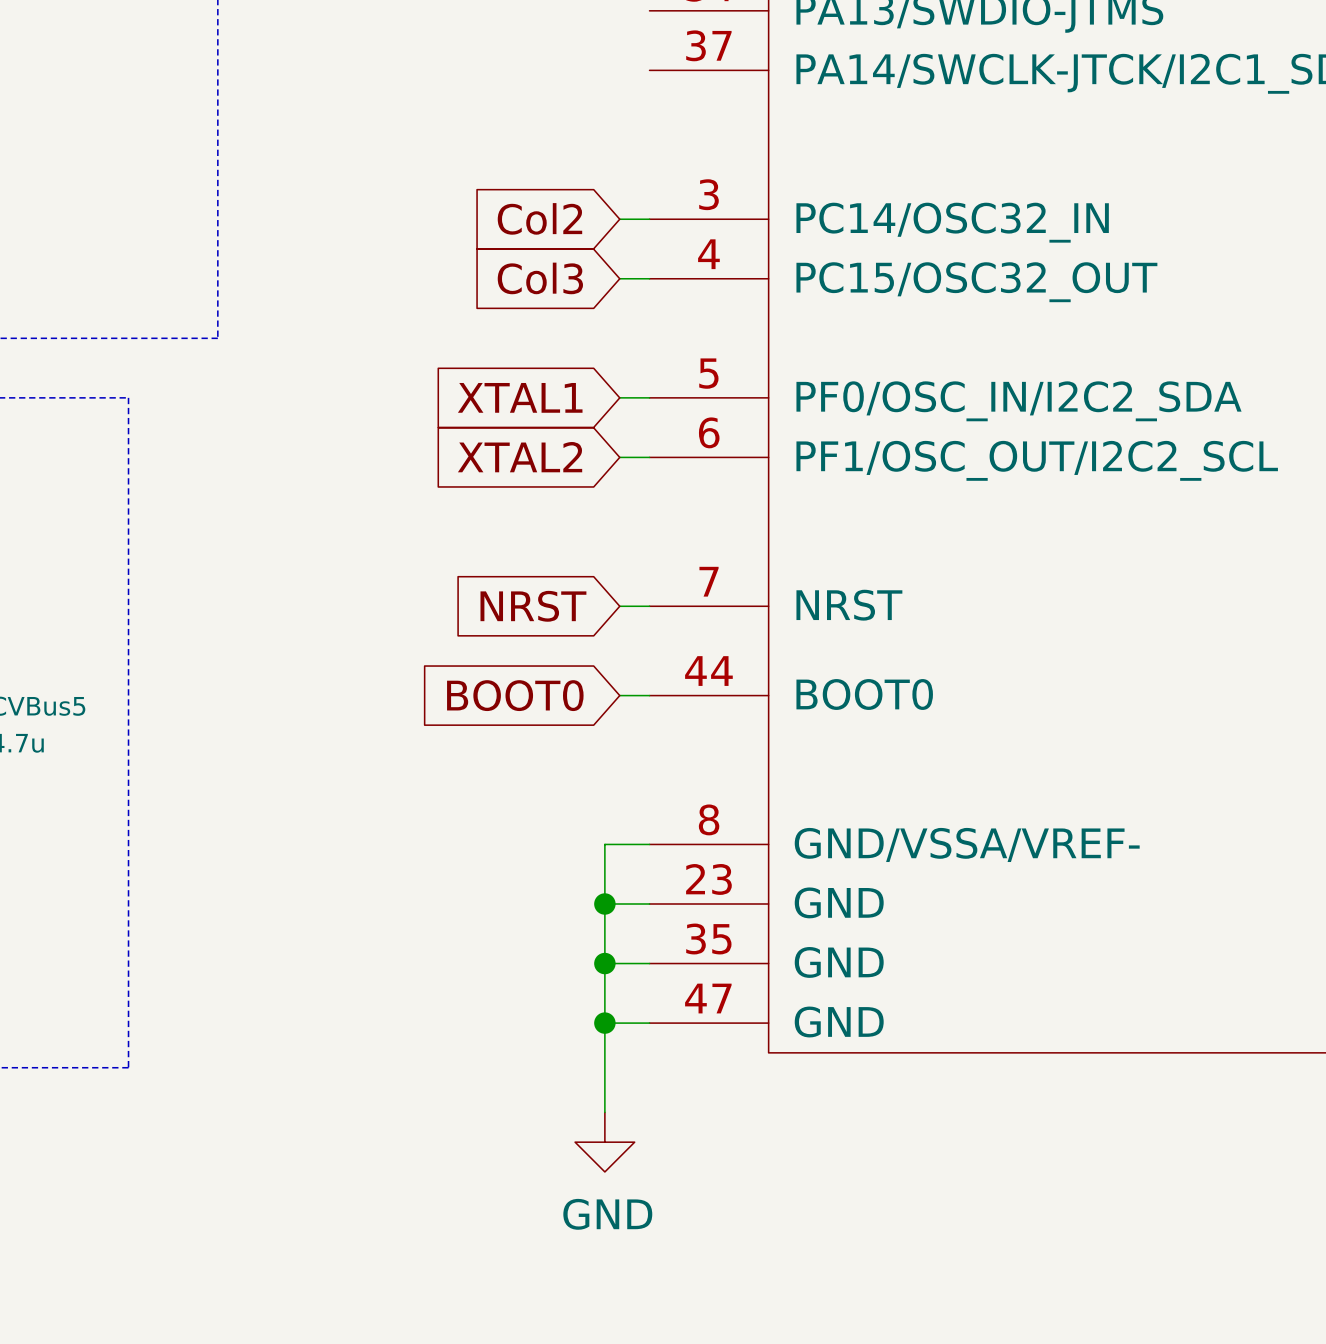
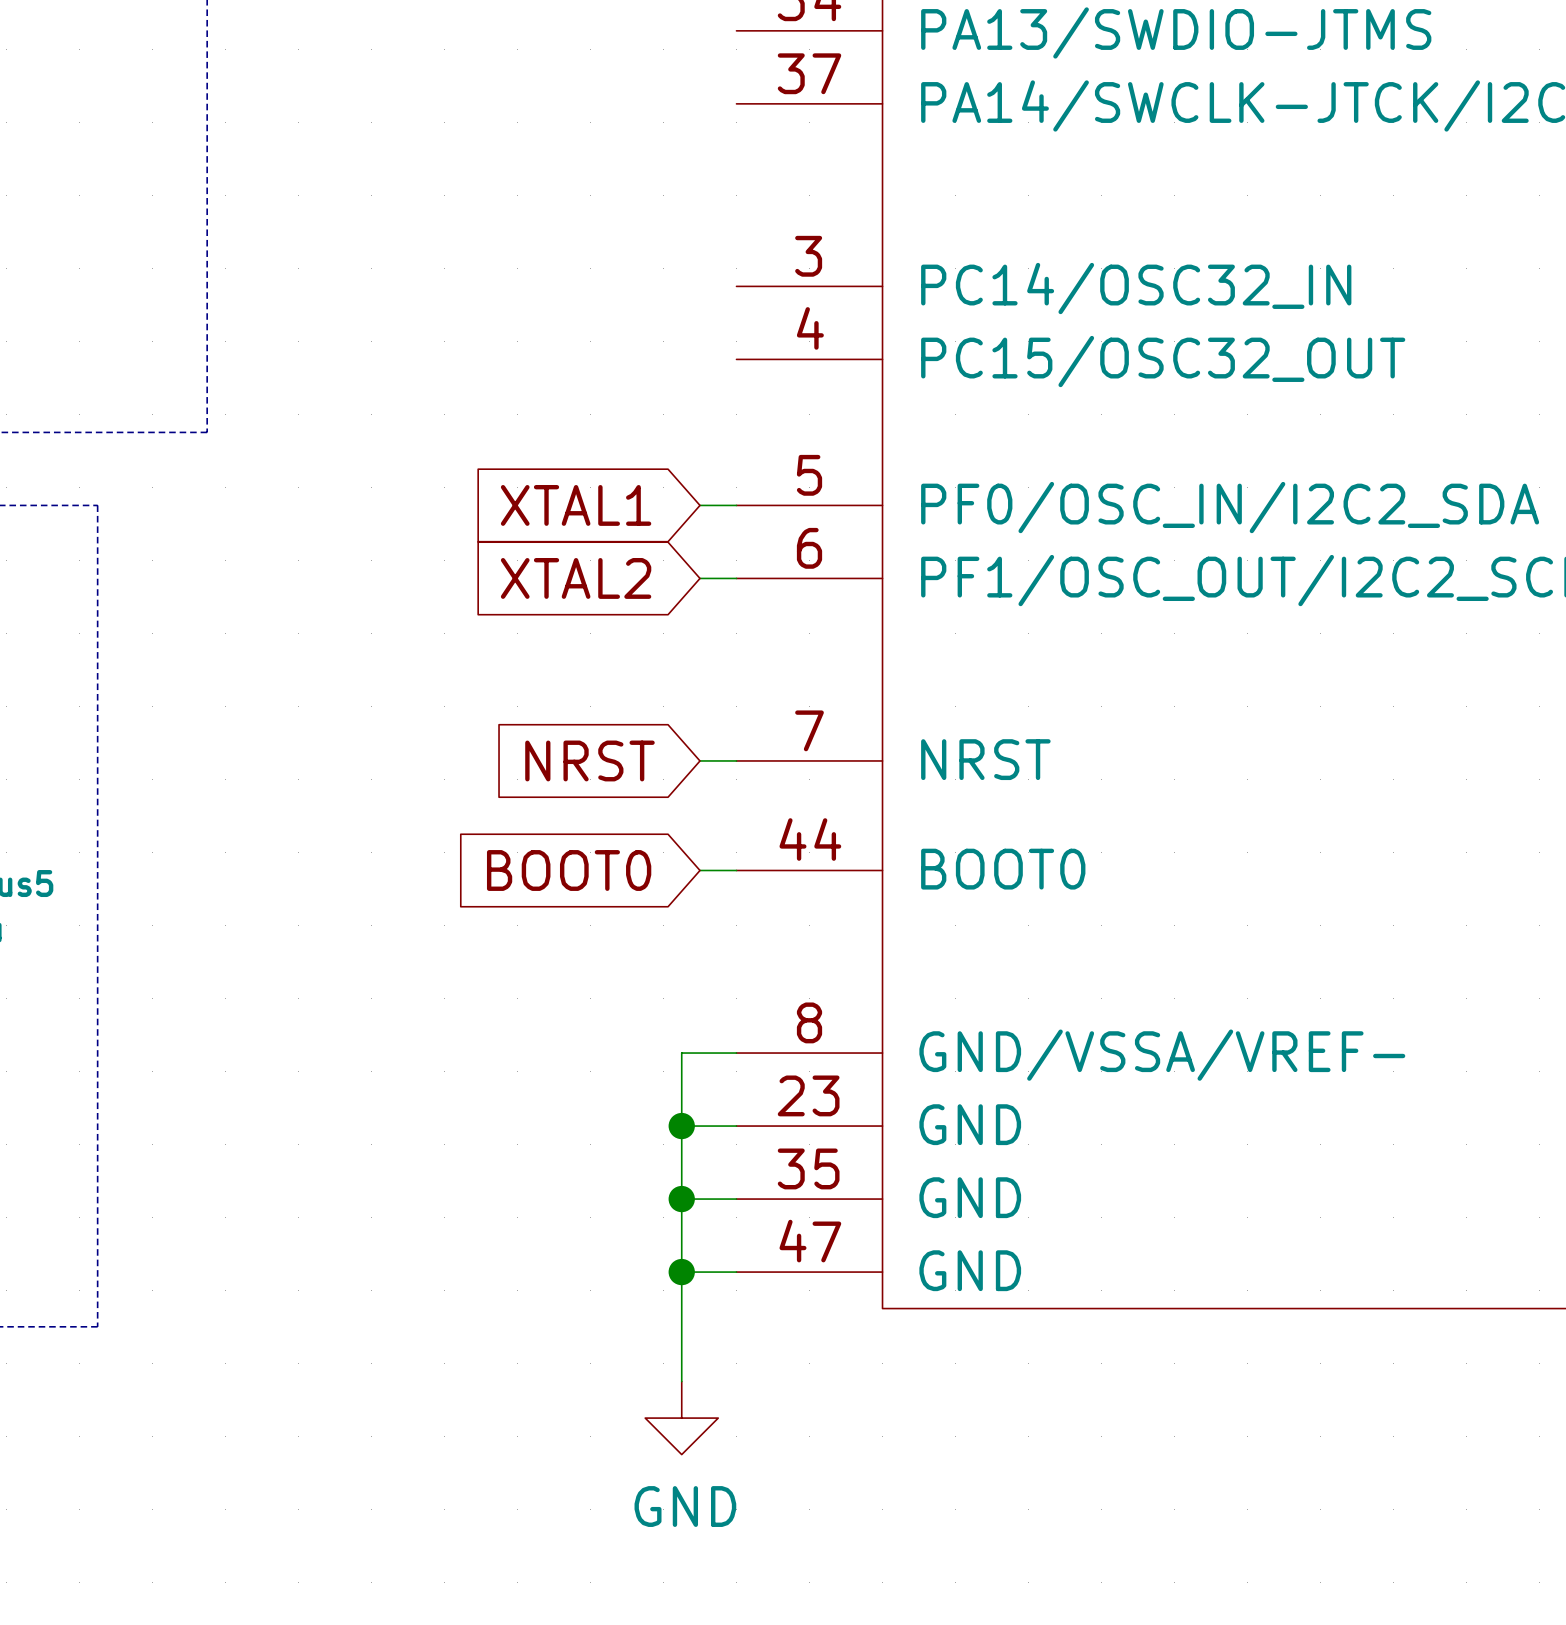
global label: Col2 (539, 218) -> none
wire: (619, 219) (649, 219) -> none
global label: Col3 (540, 278) -> none
wire: (619, 278) (649, 278) -> none

